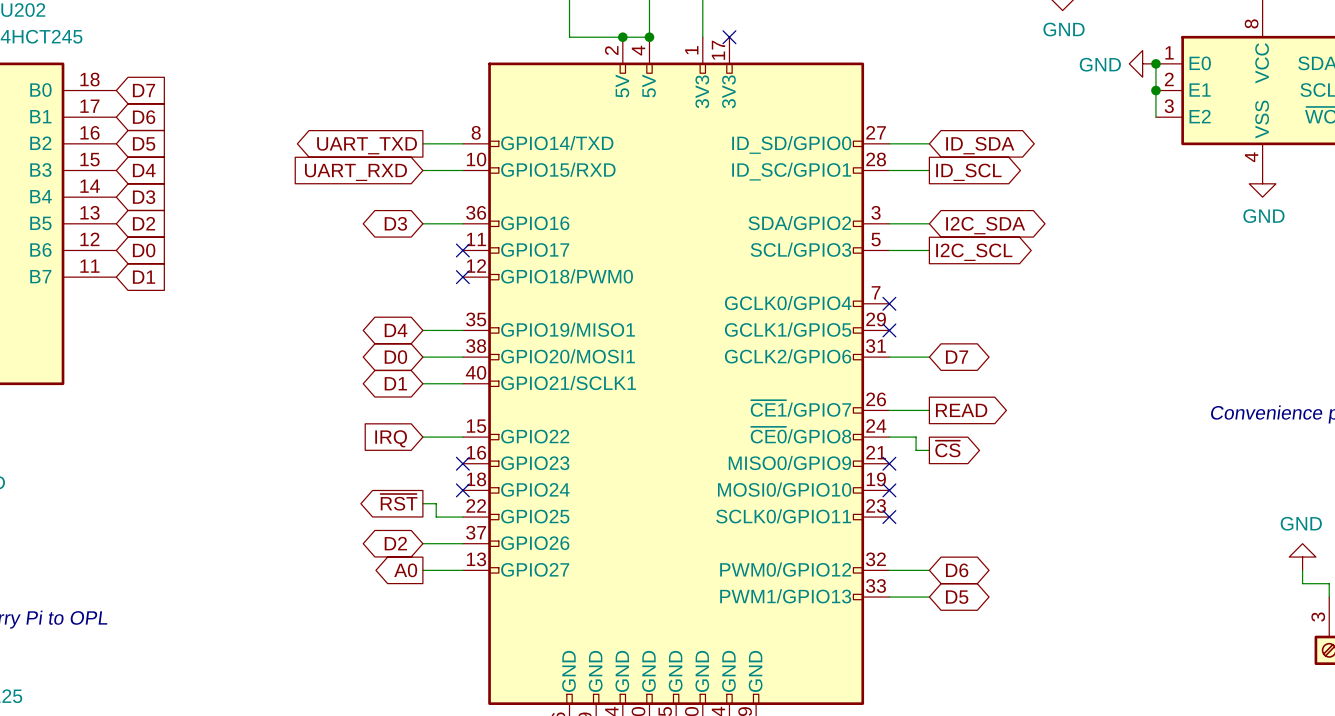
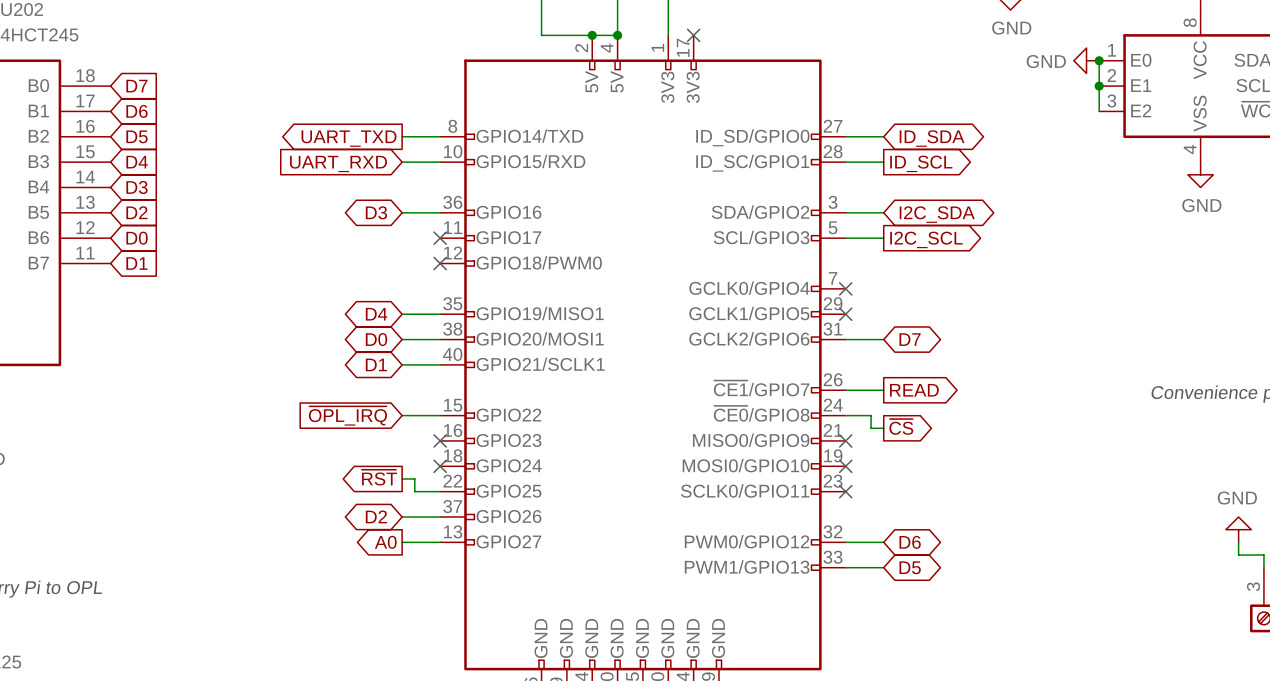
global label: IRQ (391, 438) -> ~{OPL_IRQ} (347, 415)

